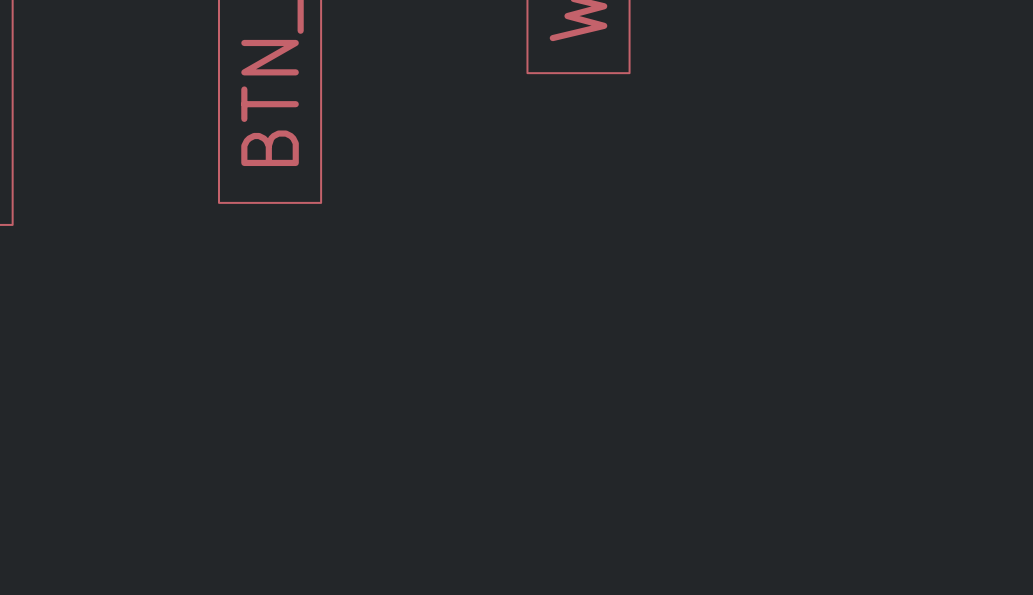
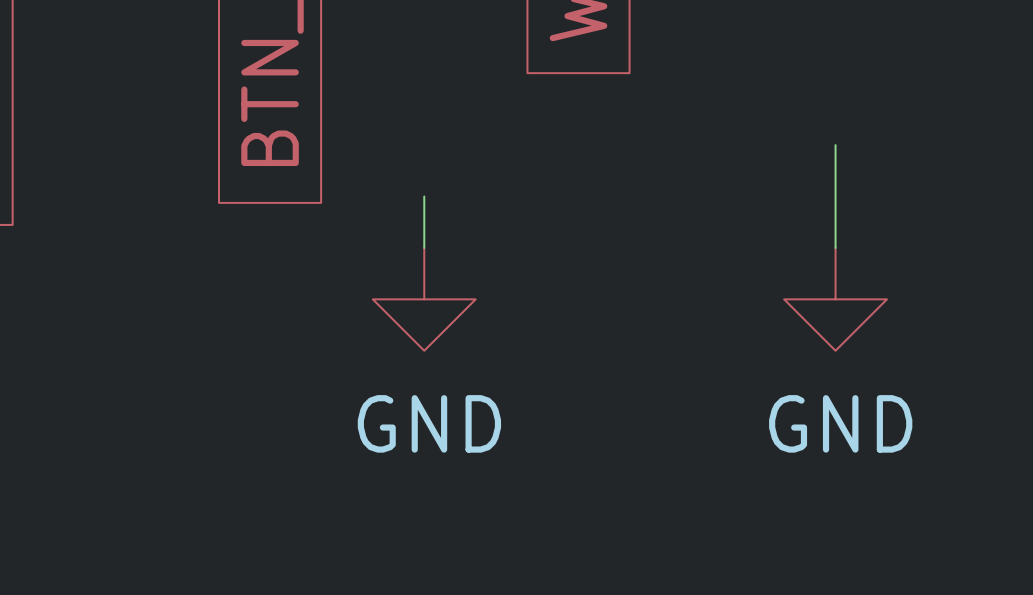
wire: none -> (835, 145) (835, 247)
wire: none -> (424, 196) (424, 247)
power symbol: none -> GND (424, 299)
power symbol: none -> GND (835, 299)

